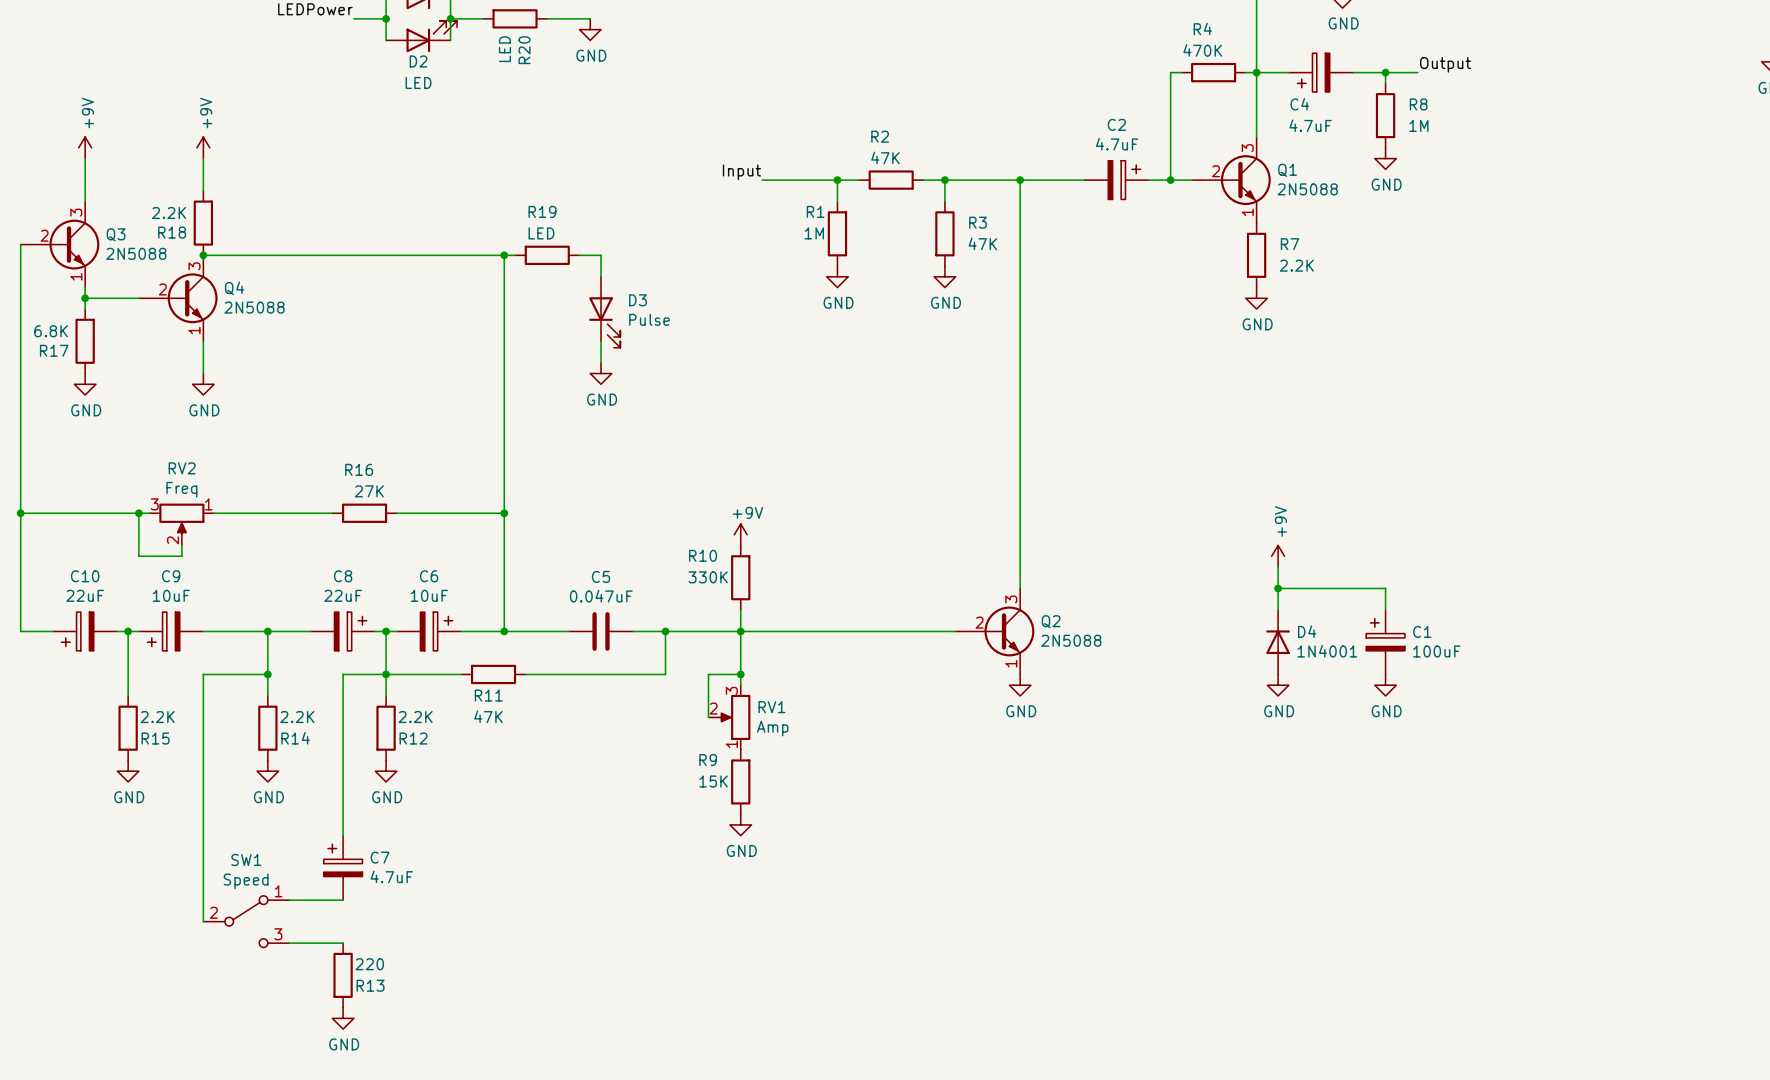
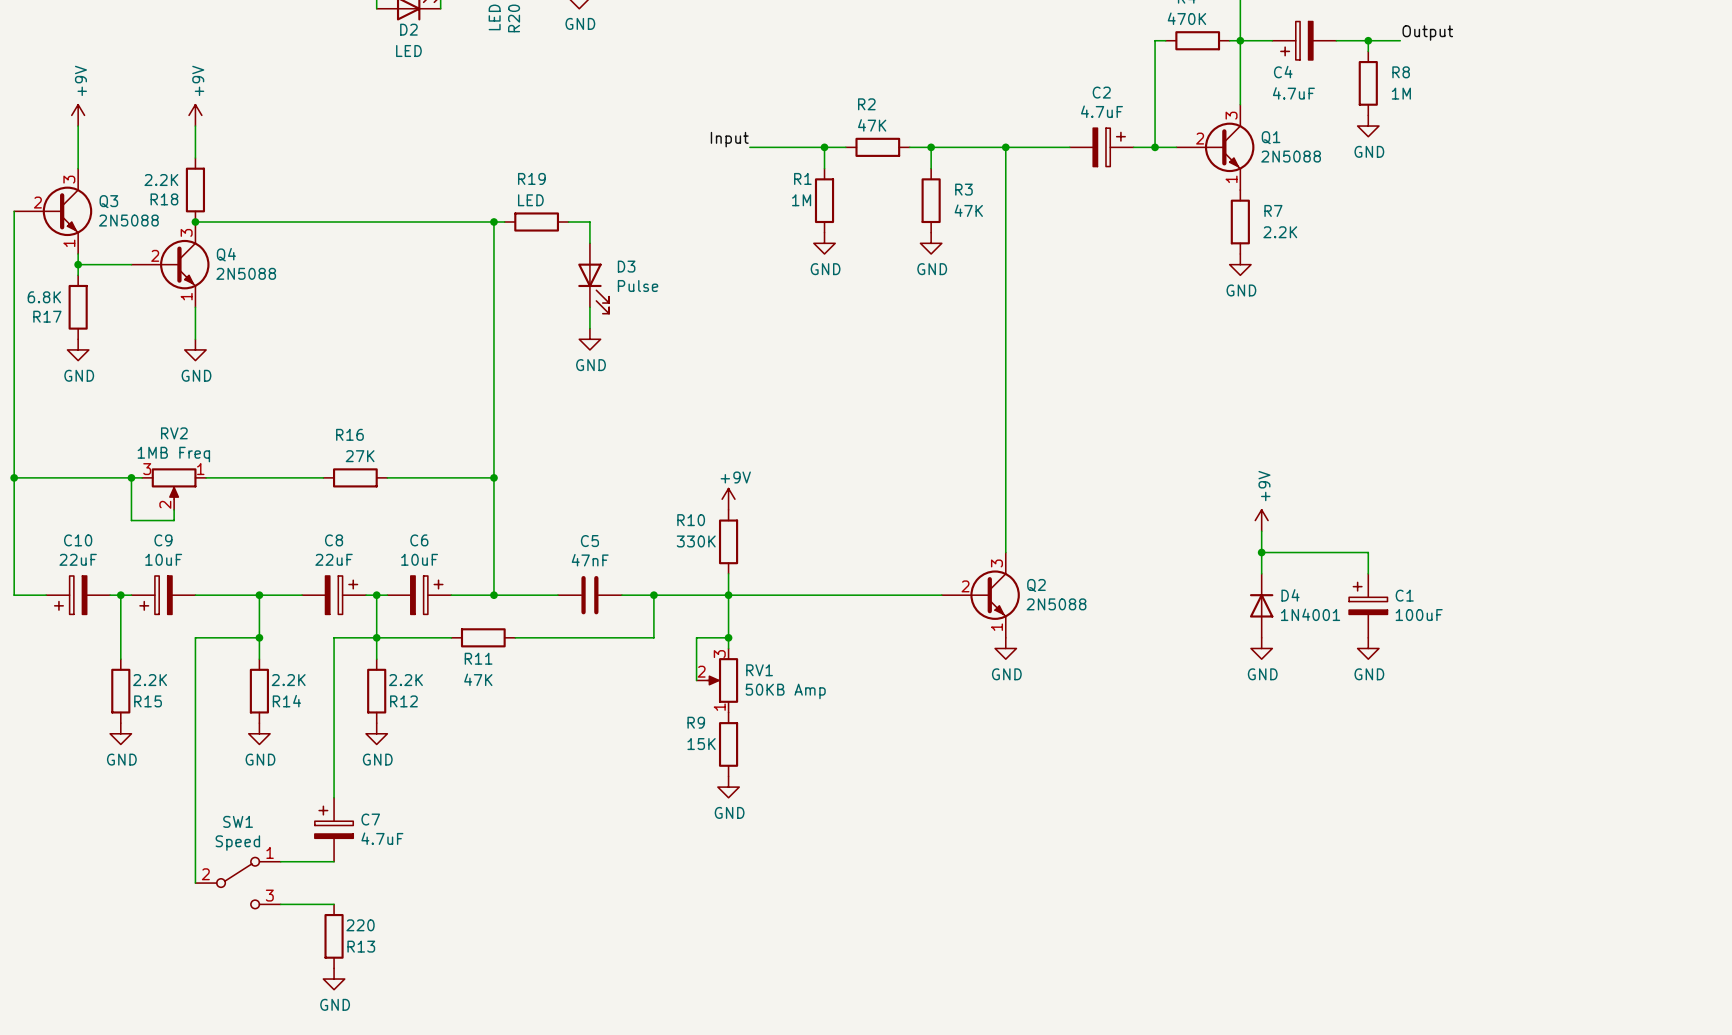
RV2 value: Freq (181, 489) -> 1MB Freq (173, 454)
C5 value: 0.047uF (601, 596) -> 47nF (590, 560)
RV1 value: Amp (772, 728) -> 50KB Amp (785, 691)

